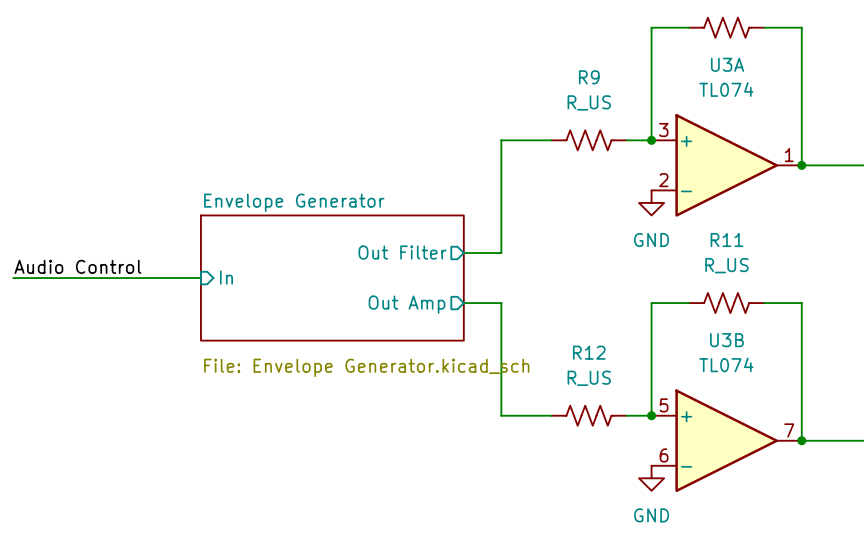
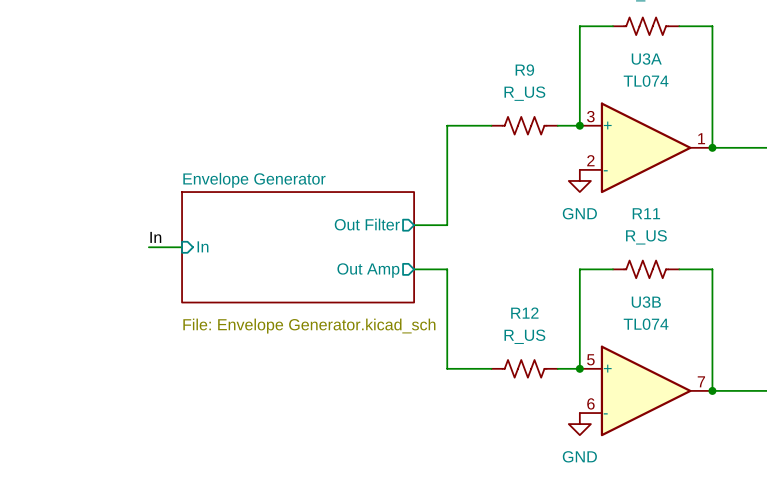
label: Audio Control (77, 266) -> none
label: none -> In (155, 237)
wire: (13, 278) (163, 278) -> none

